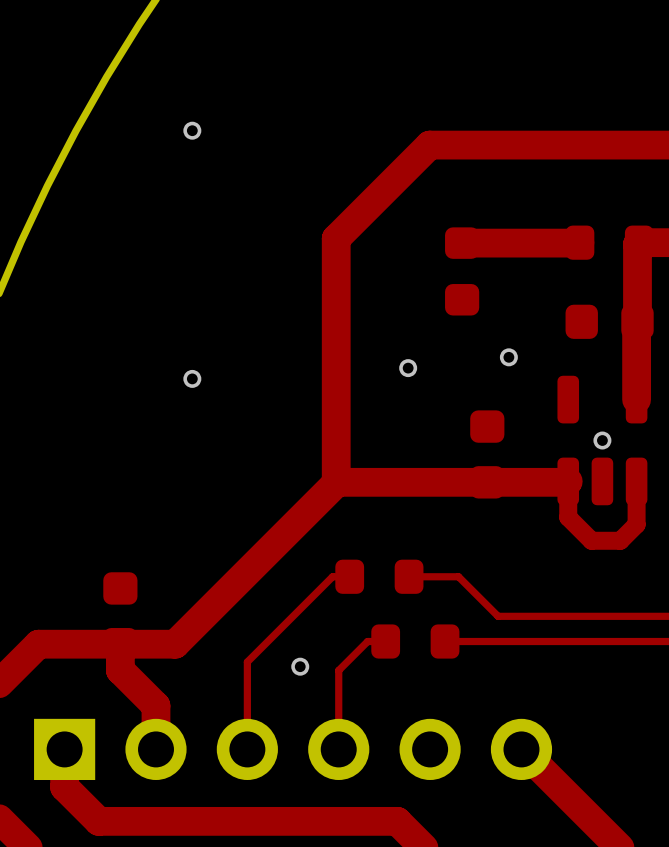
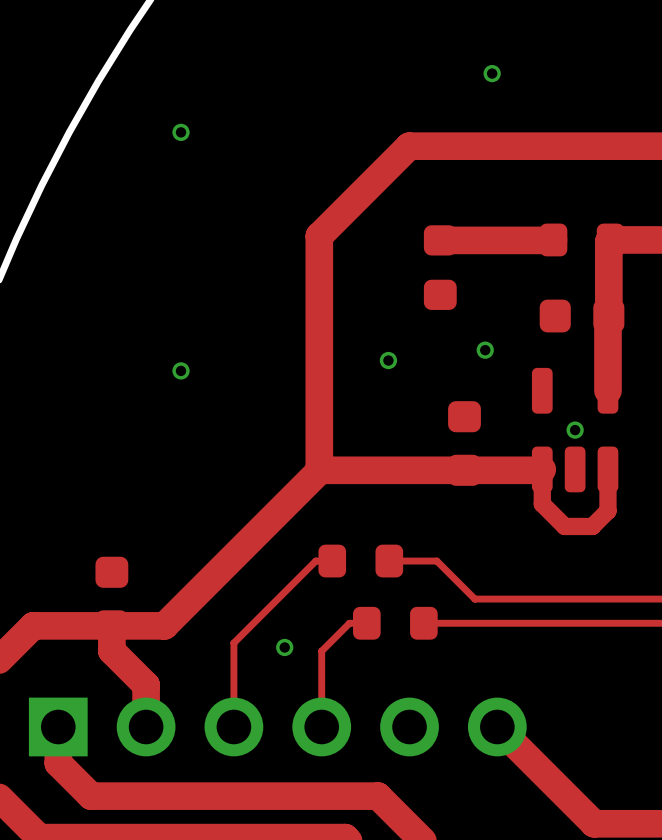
via: none -> (492, 73)

